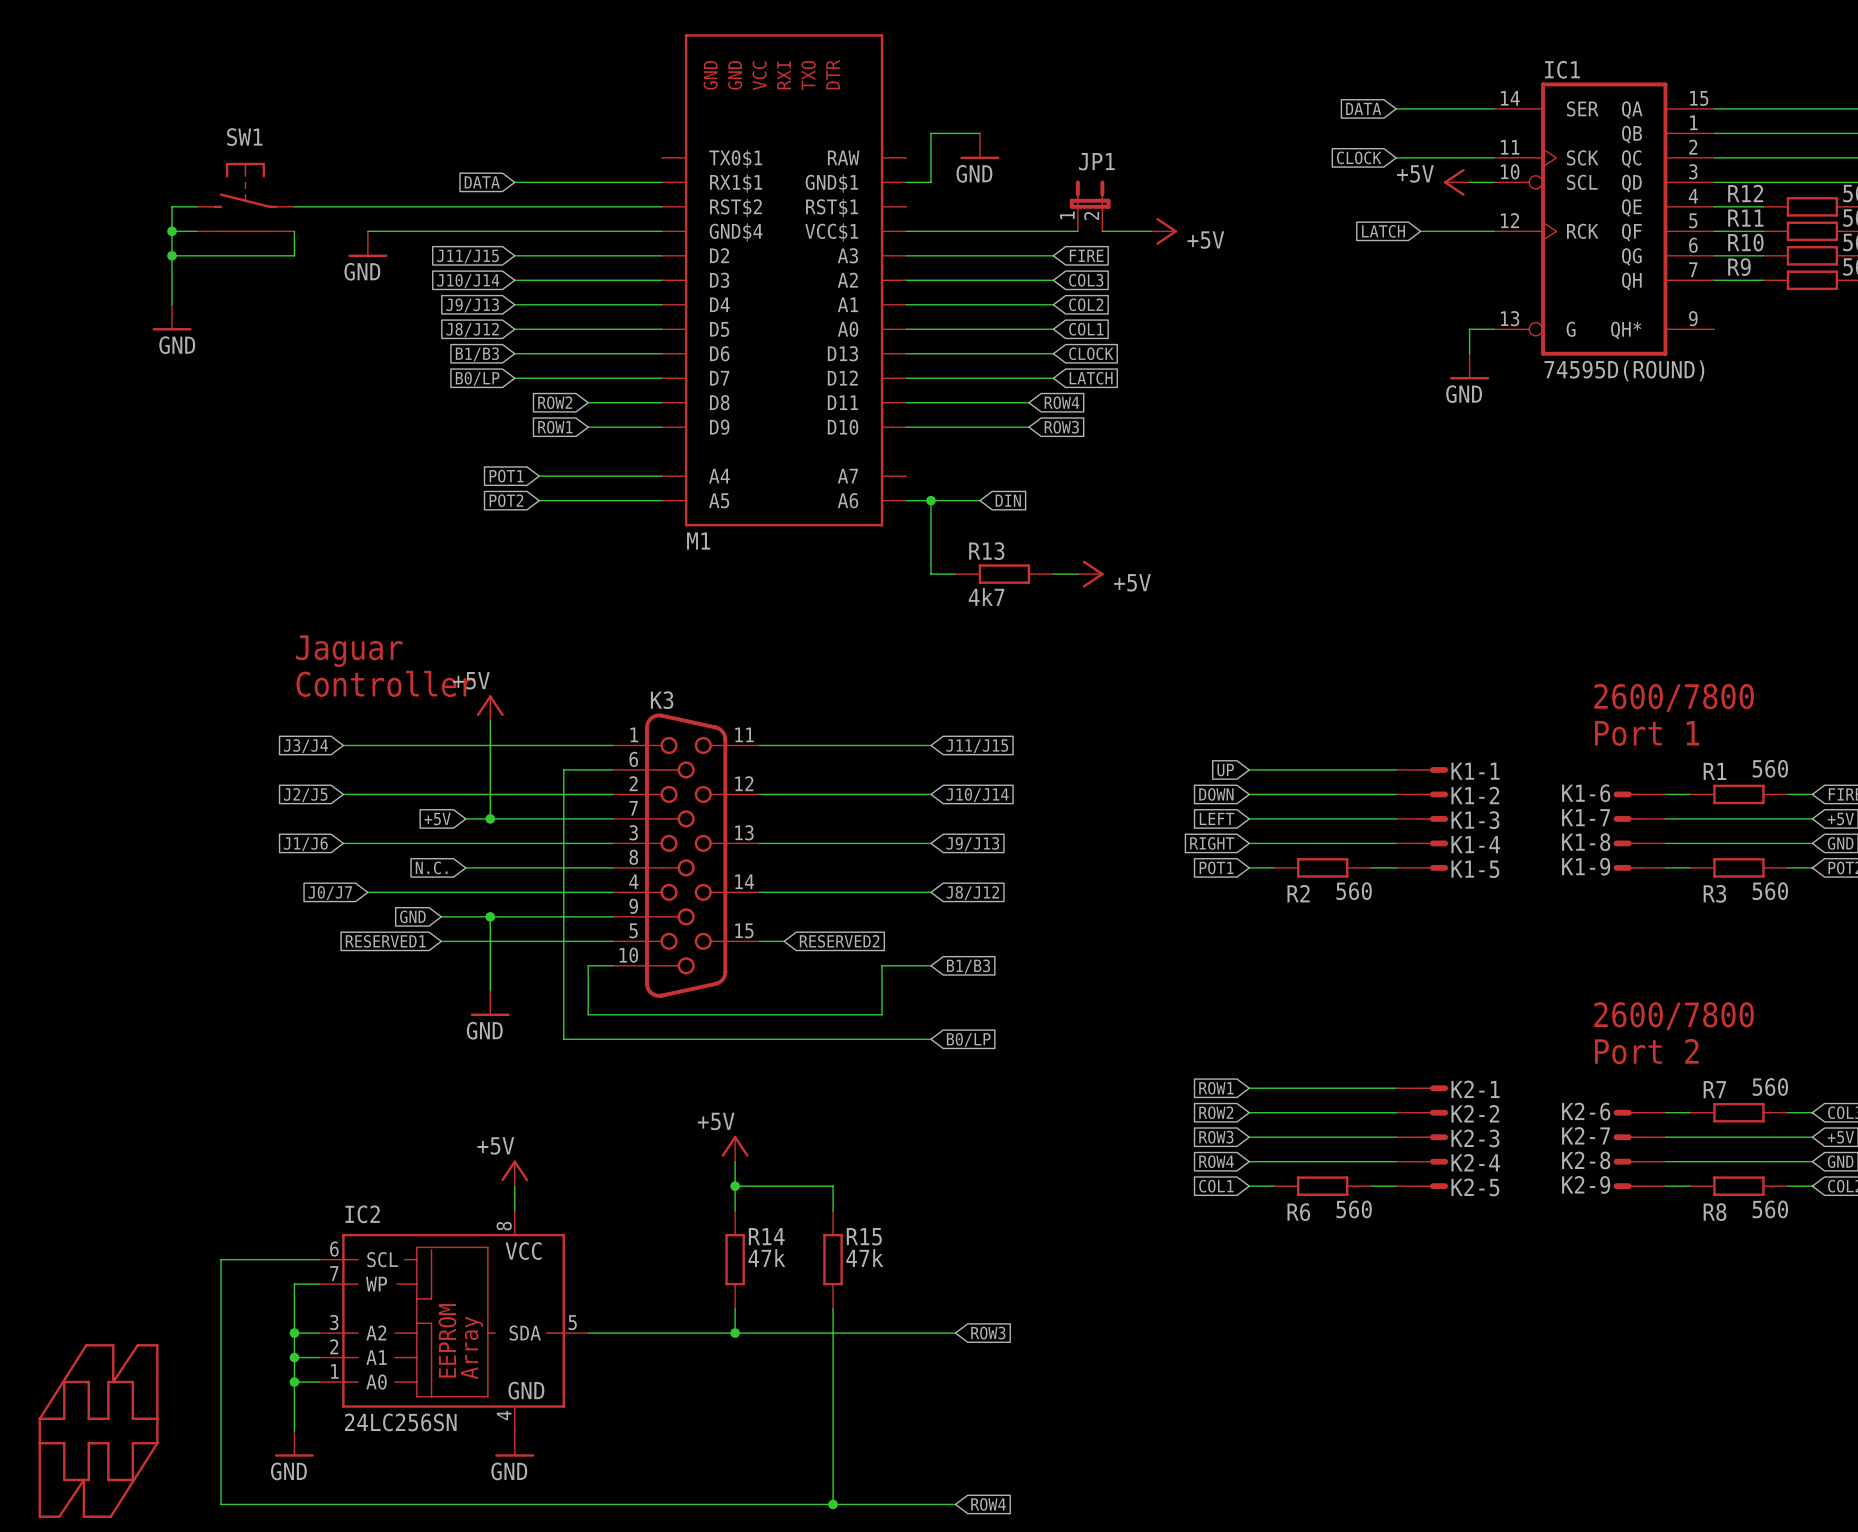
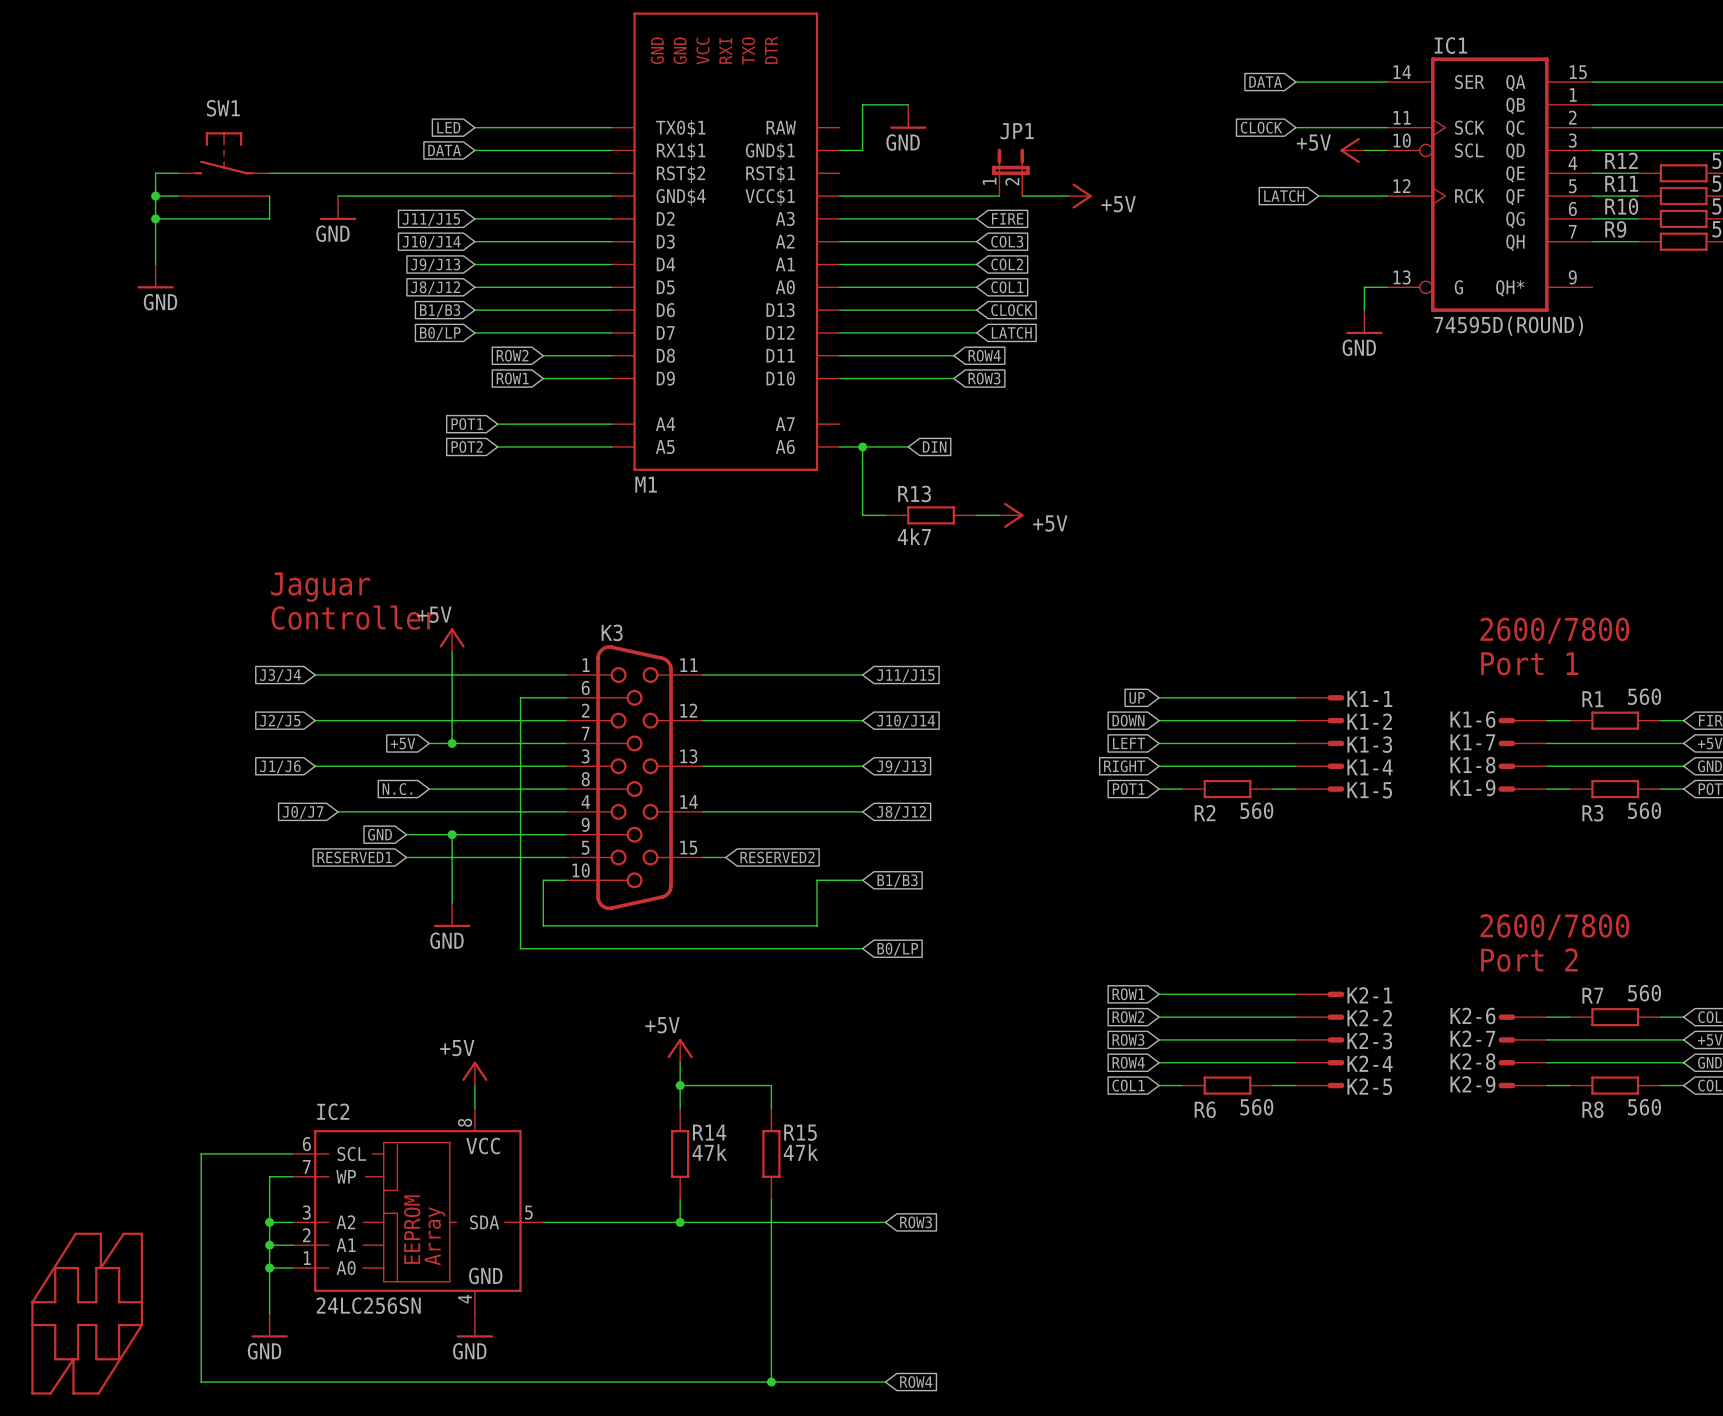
global label: none -> LED (448, 127)
wire: none -> (474, 127) (611, 127)

